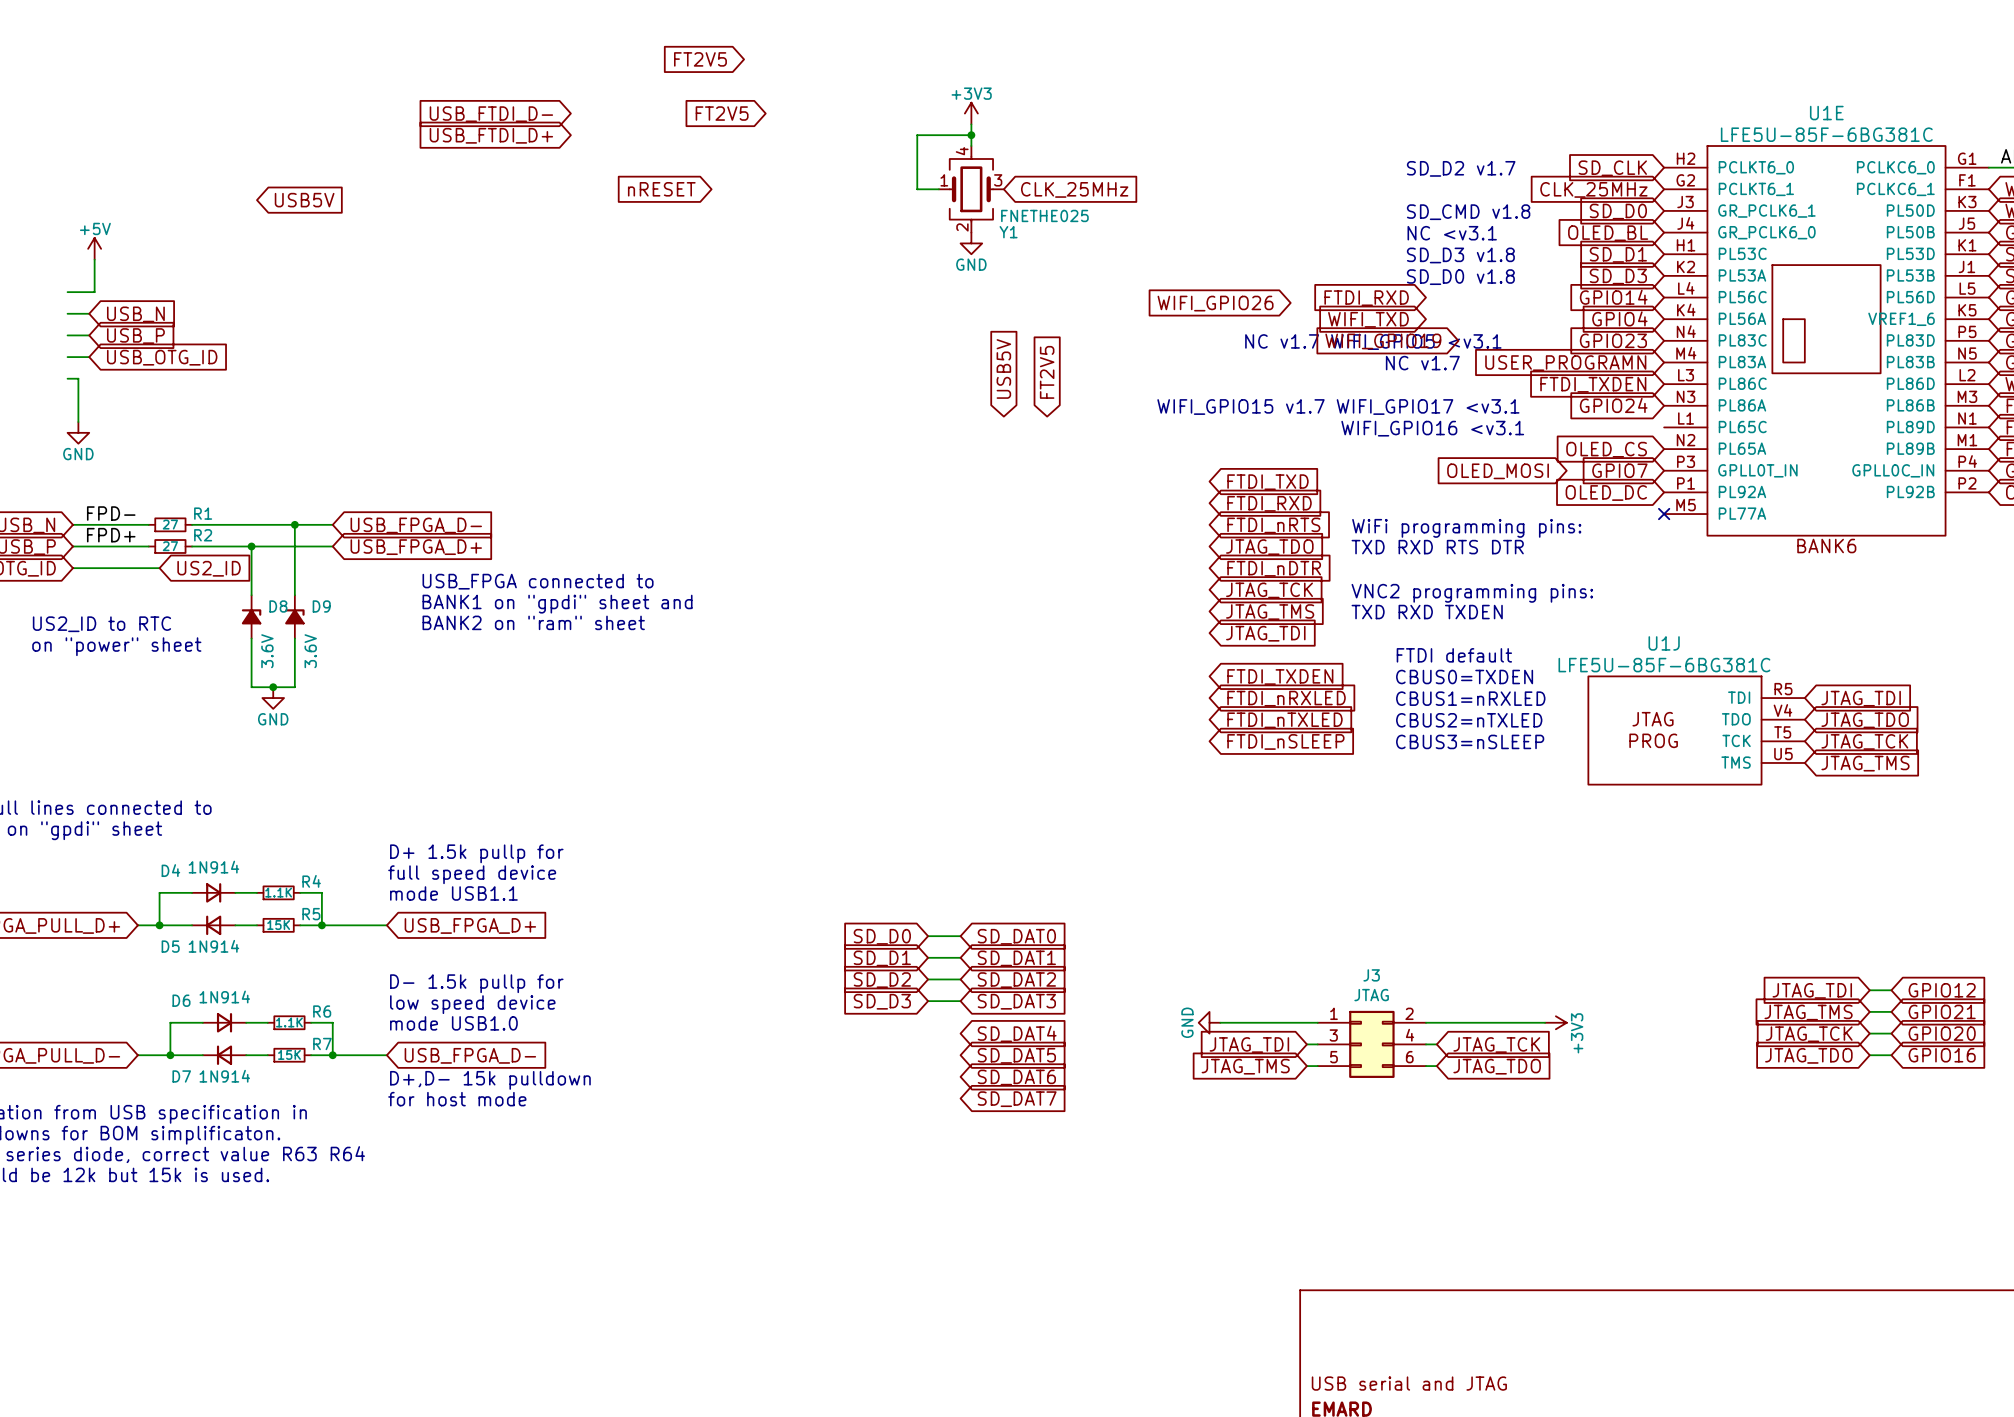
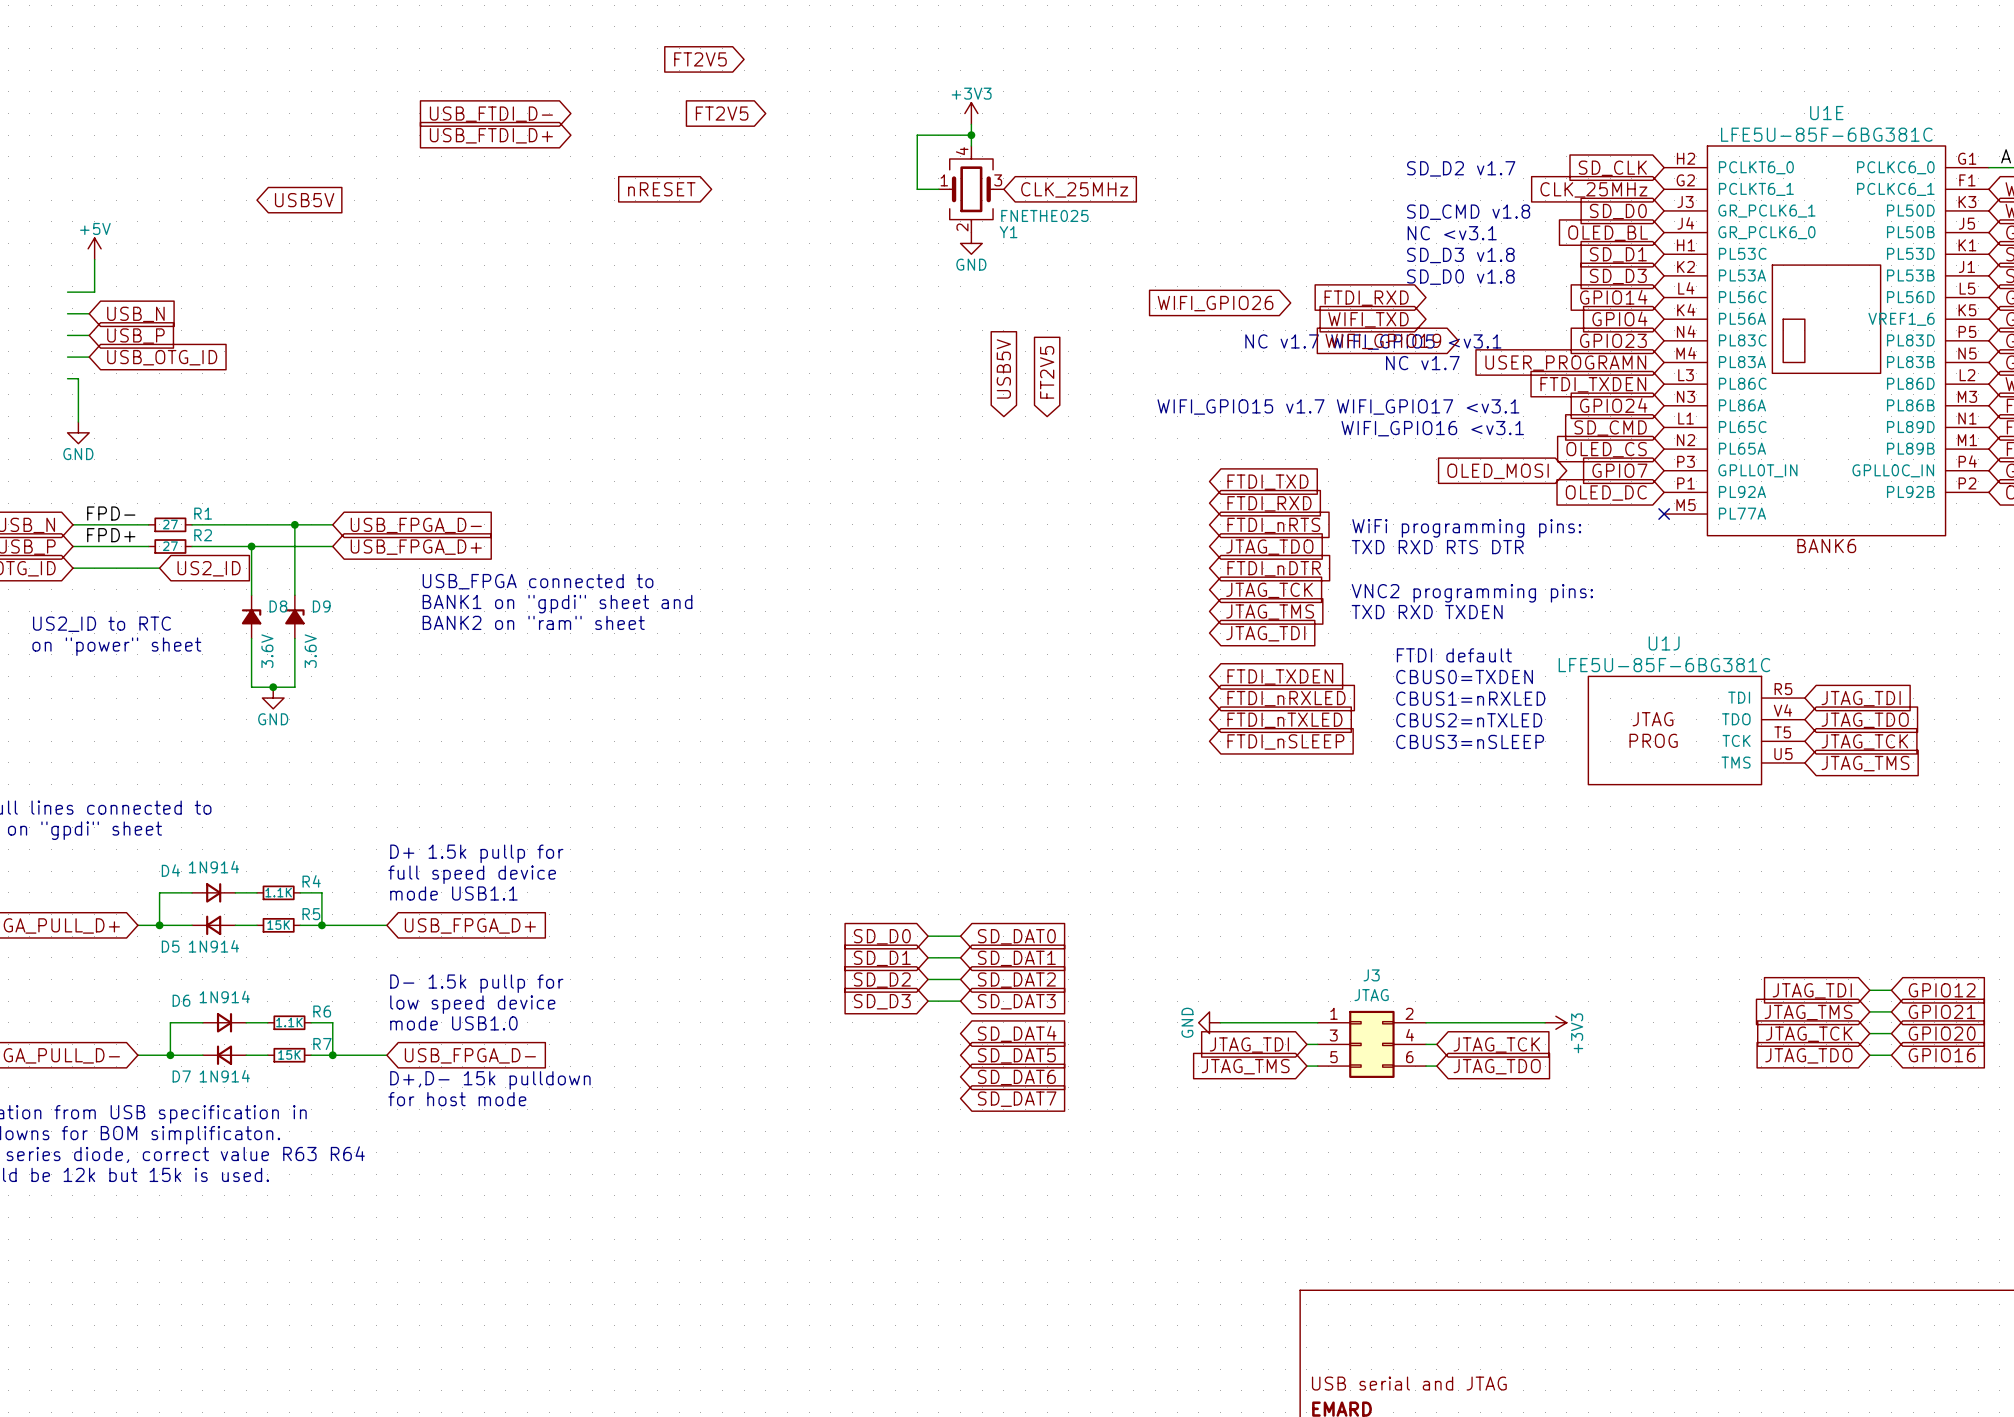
global label: none -> SD_CMD (1610, 428)

